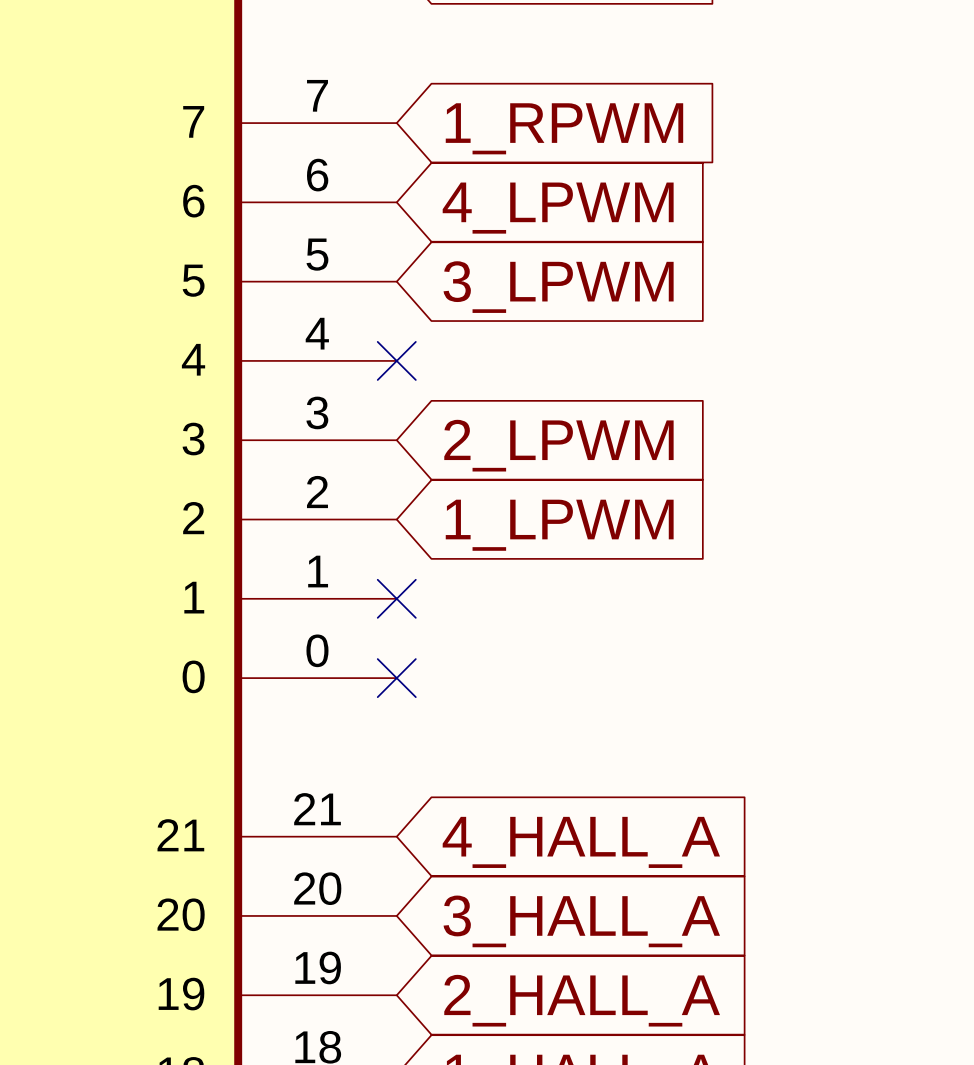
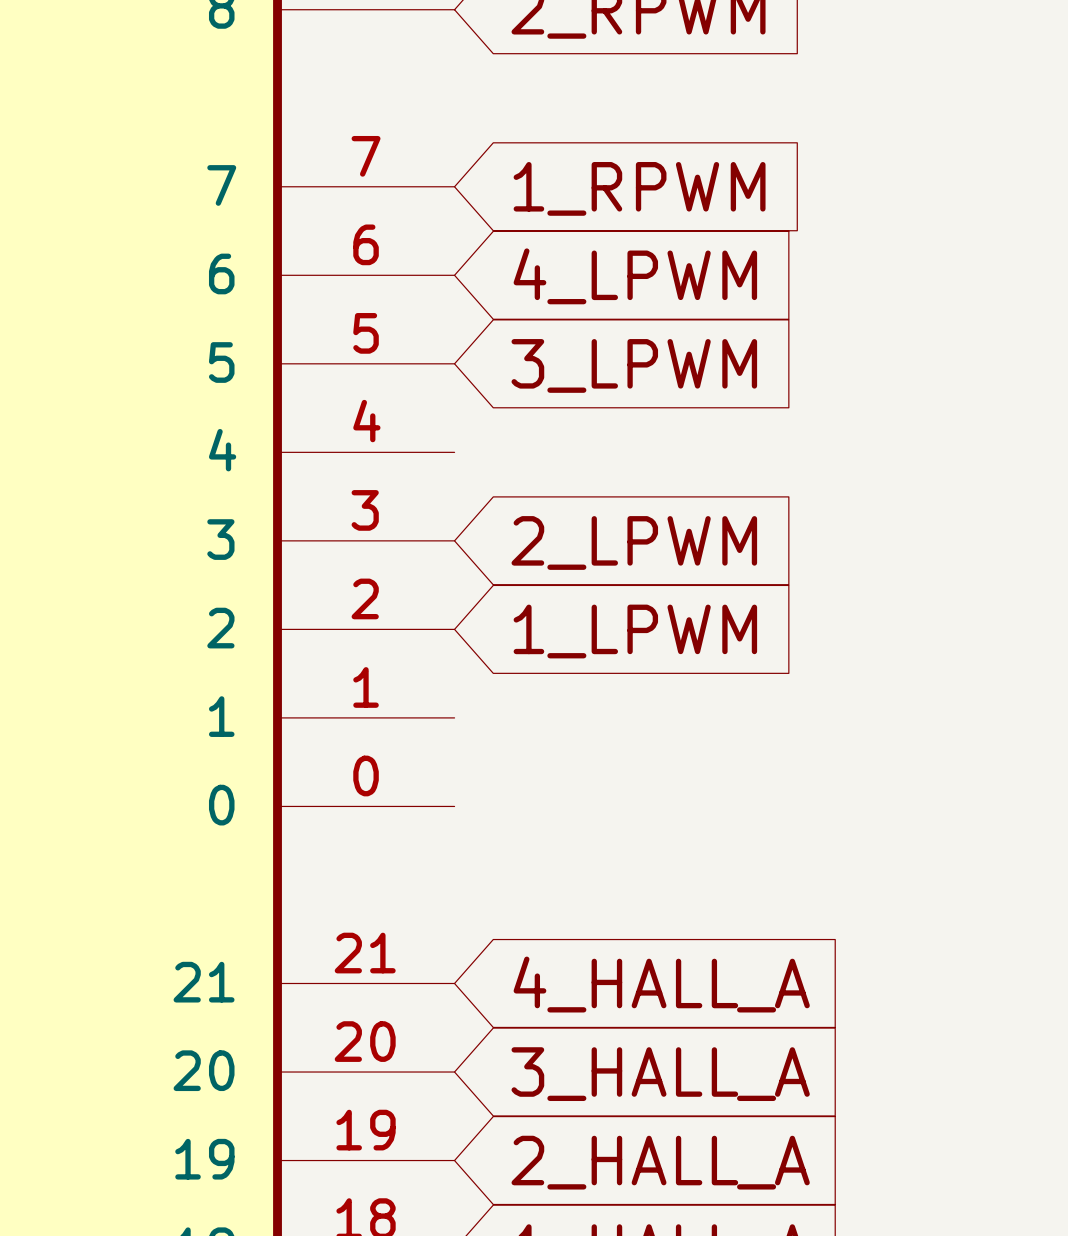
no-connect mark: (396, 360) -> none
no-connect mark: (396, 598) -> none
no-connect mark: (396, 678) -> none

